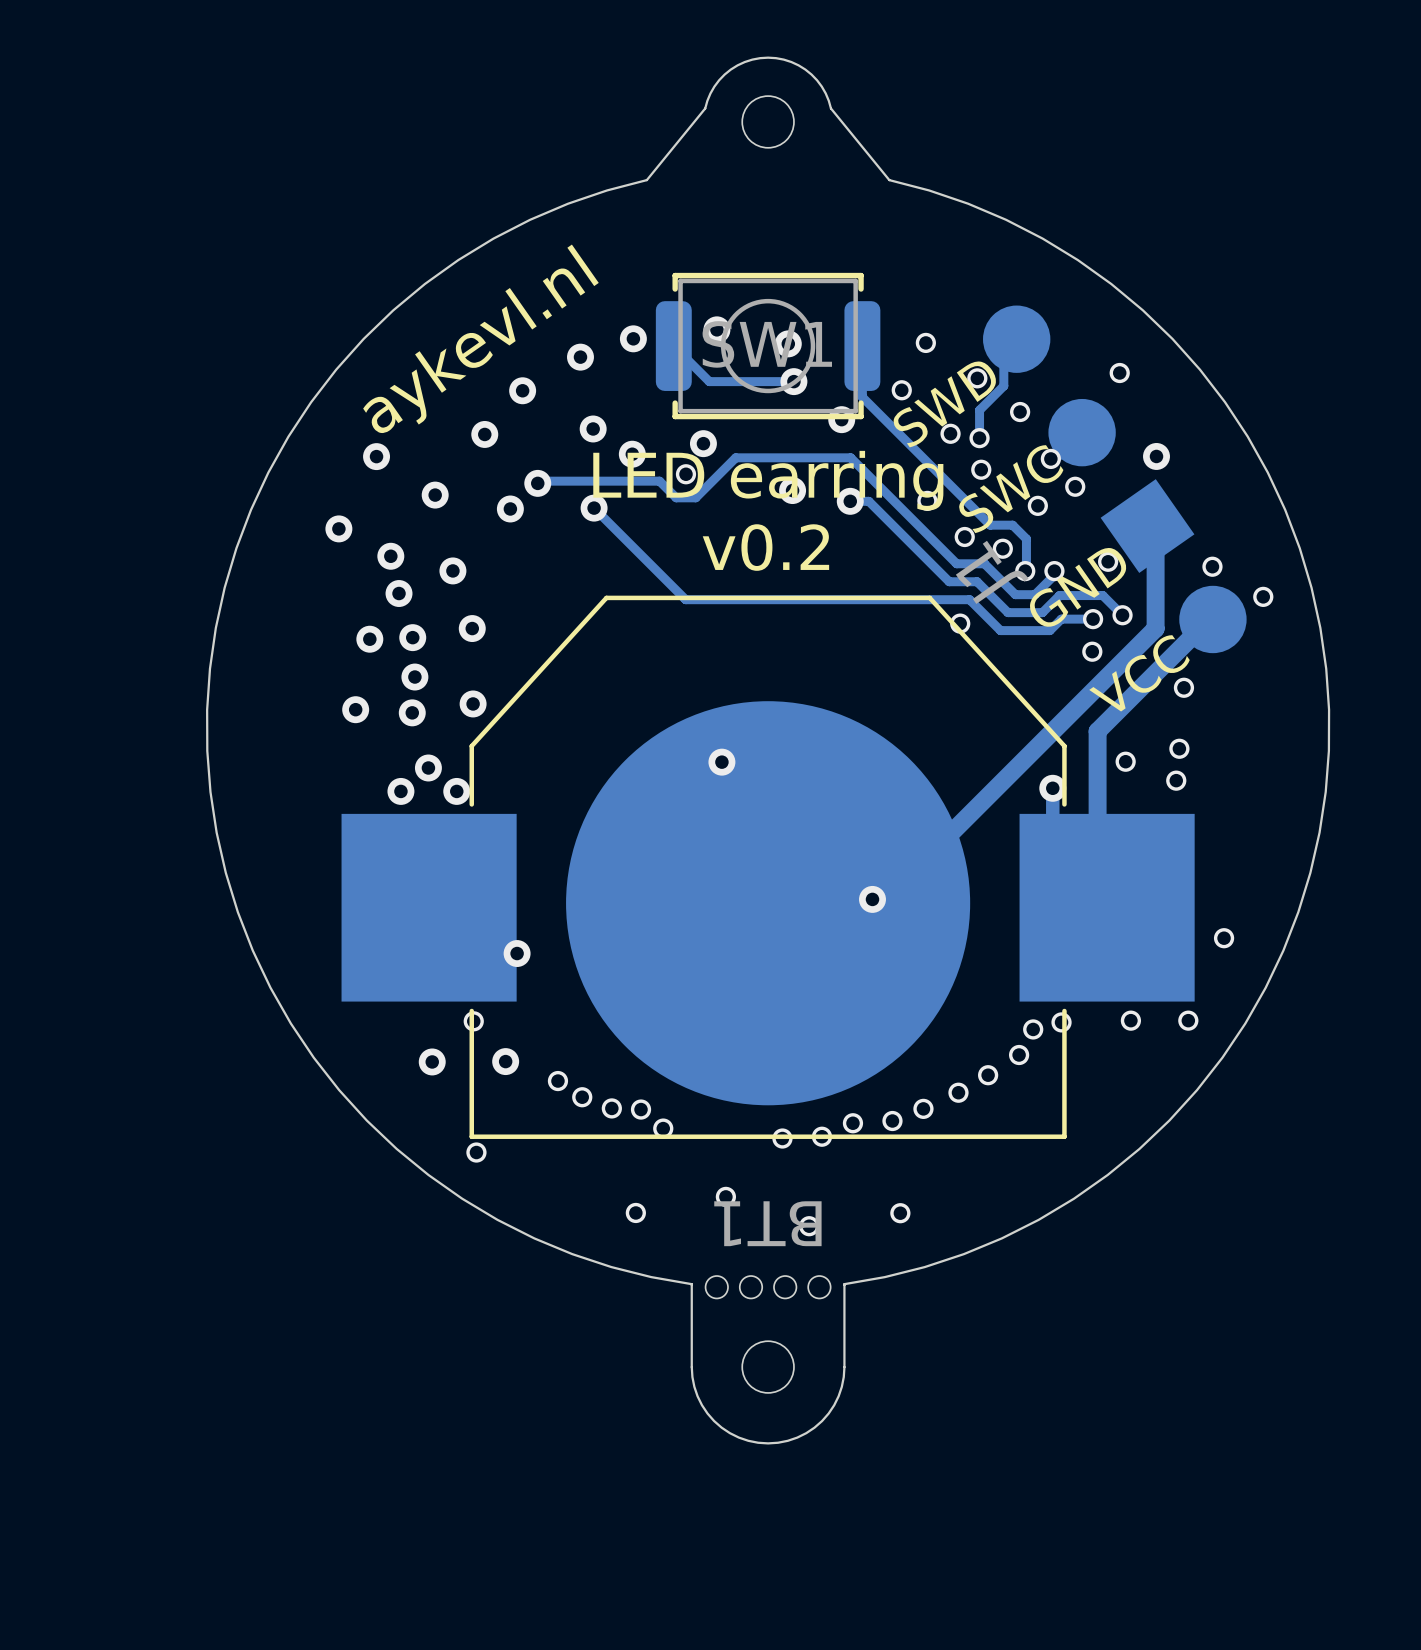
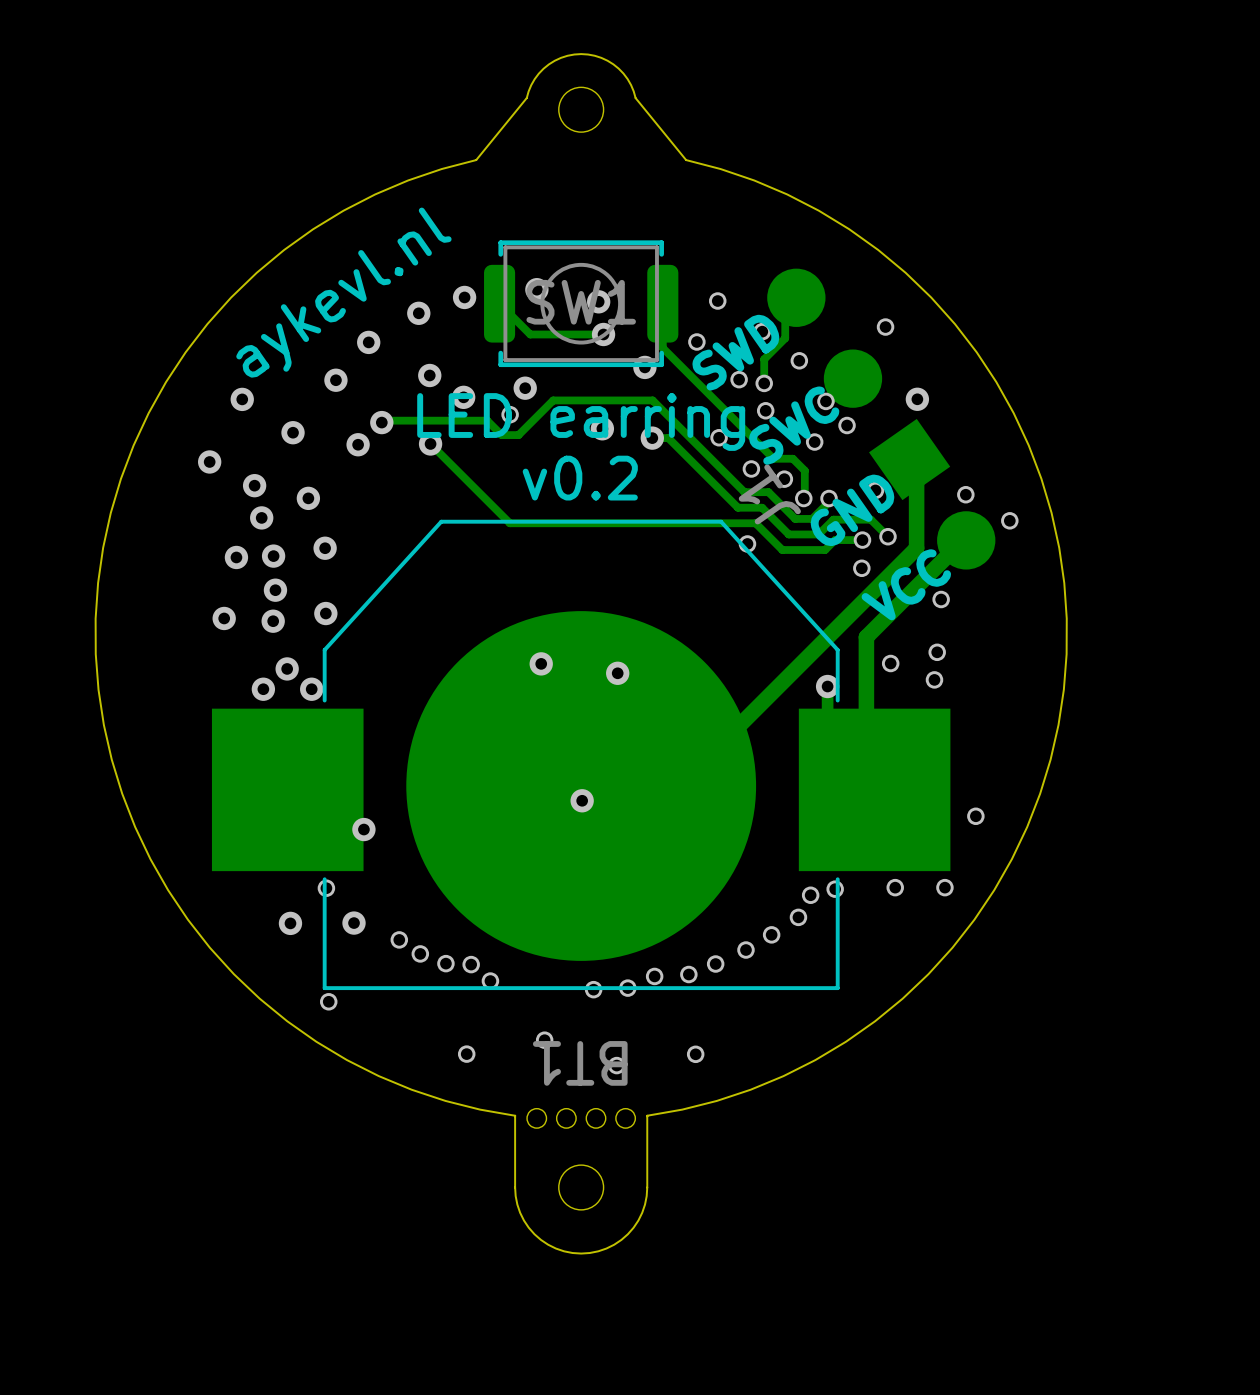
via: none -> (617, 673)
via: (872, 899) -> none
via: none -> (582, 800)

